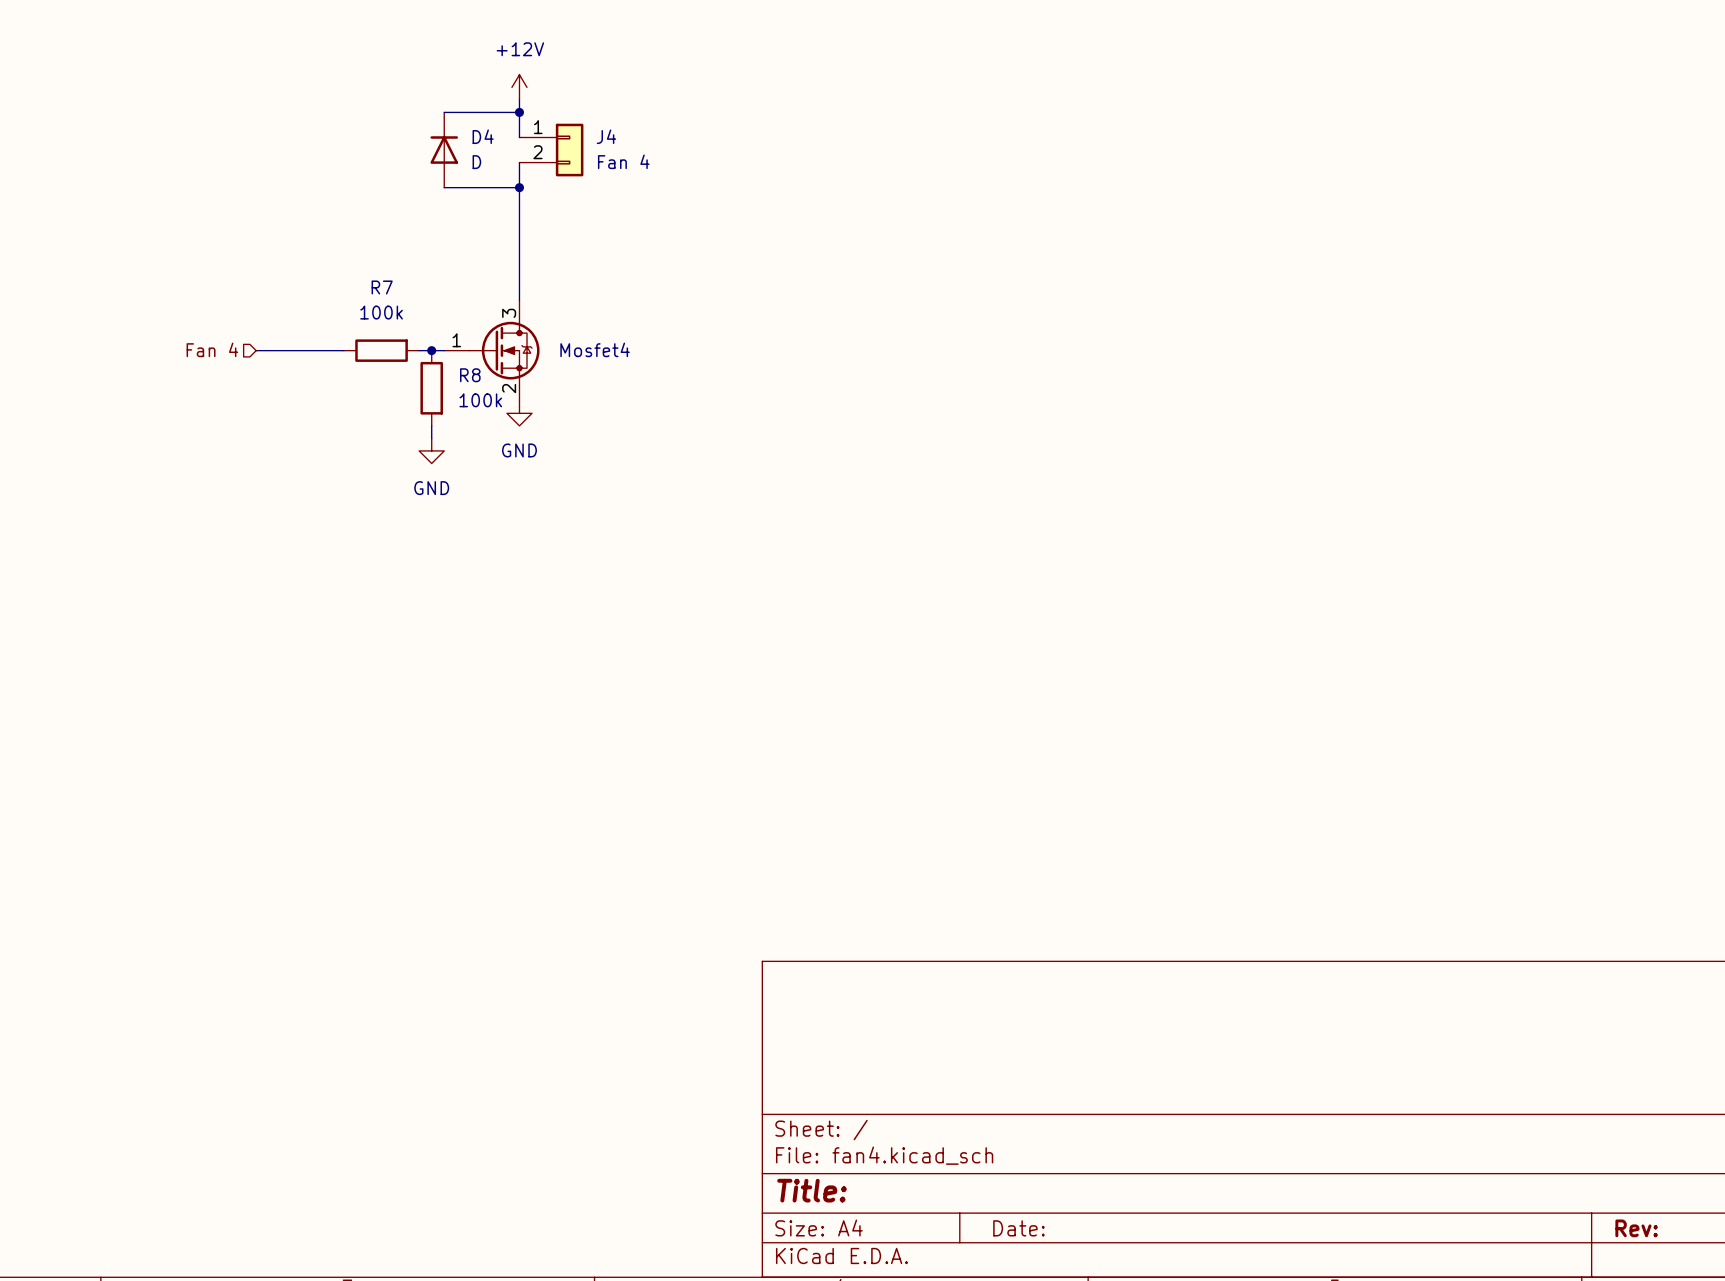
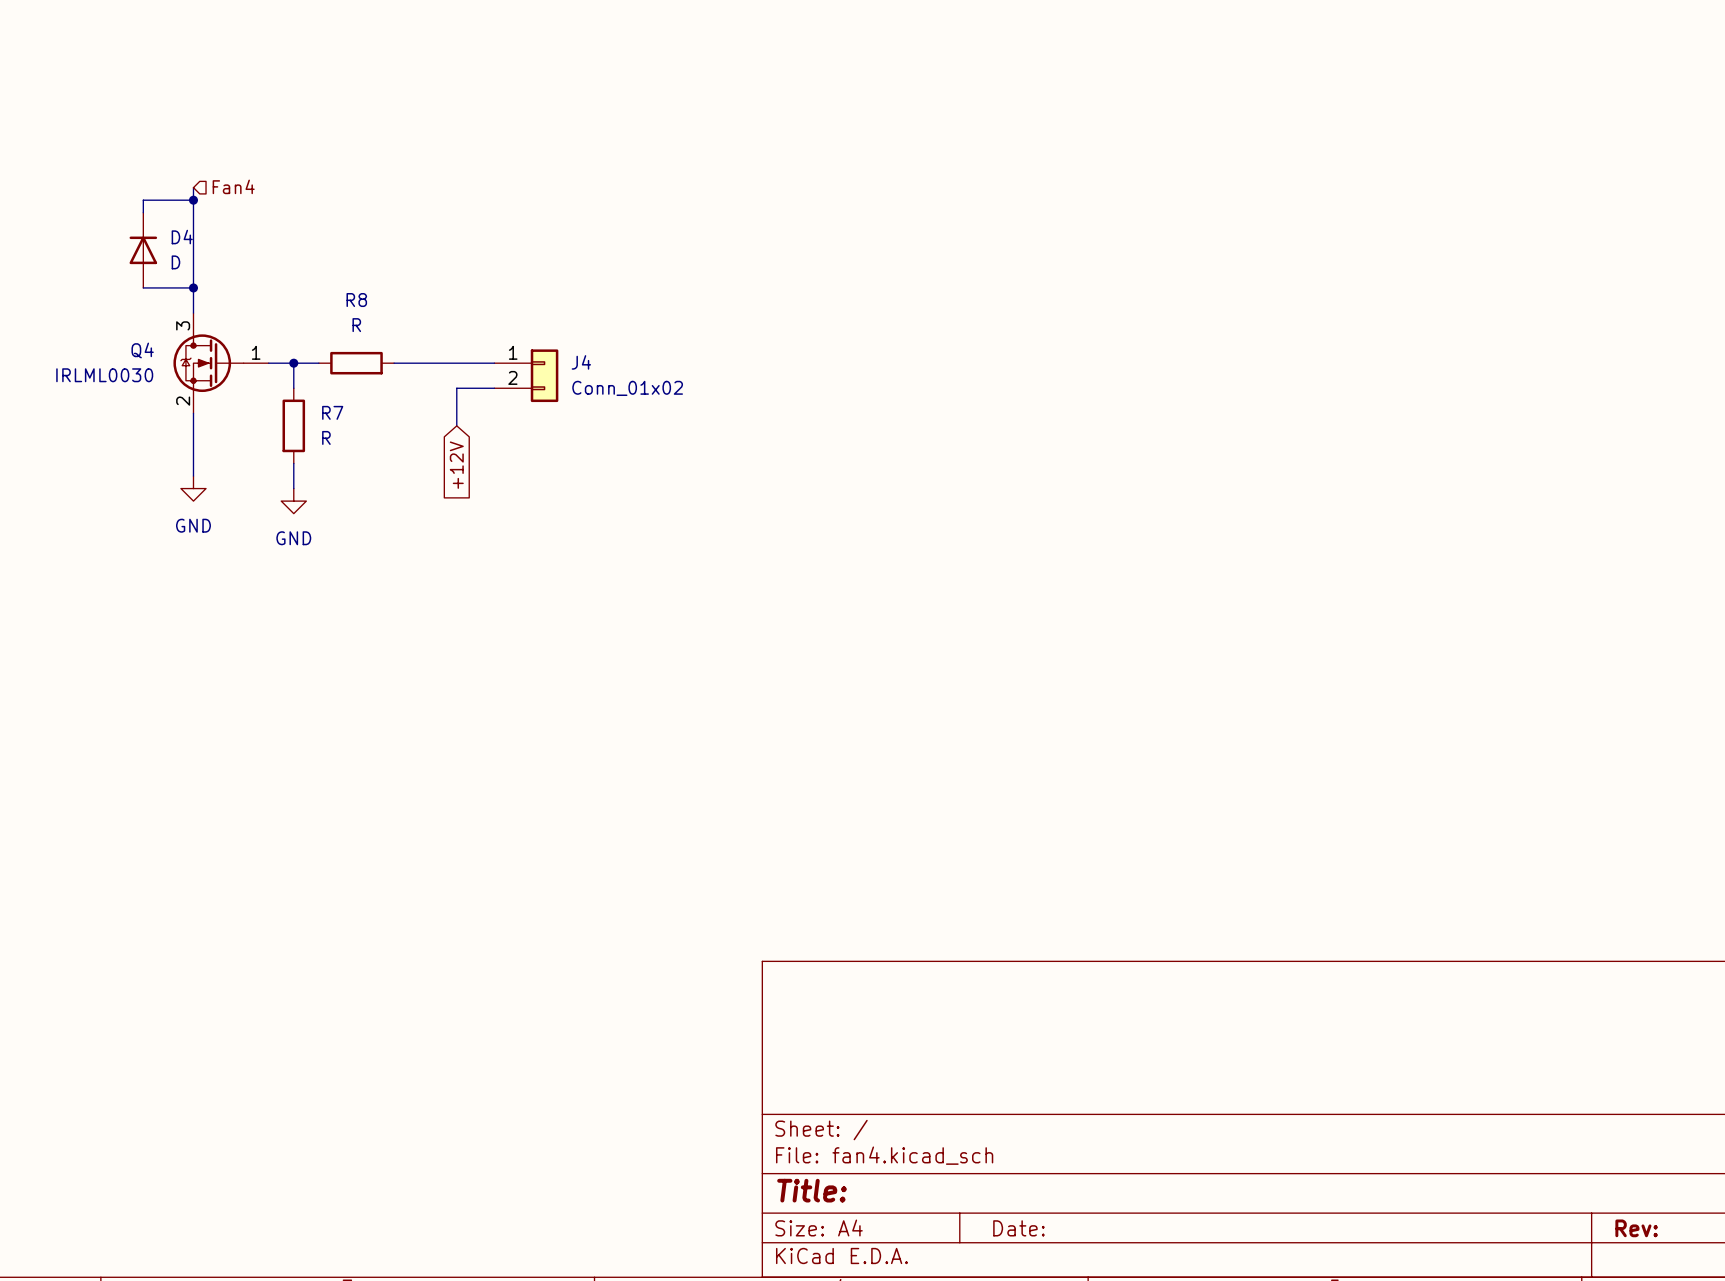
power symbol: +12V (519, 87) -> none
wire: (519, 99) (519, 137) -> none
wire: (444, 112) (519, 112) -> none
junction: (519, 112) -> none
D4 position: (444, 150) -> (143, 250)
J4 position: (551, 150) -> (526, 375)
J4 value: Fan 4 (623, 161) -> Conn_01x02 (627, 388)
wire: (519, 162) (519, 300) -> none
hierarchical label: none -> Fan4 (233, 186)
wire: none -> (193, 187) (193, 313)
wire: (444, 187) (519, 187) -> none
junction: (519, 187) -> none
wire: none -> (193, 200) (143, 200) (143, 212)
junction: none -> (193, 200)
wire: none -> (143, 287) (193, 287)
junction: none -> (193, 287)
R7 name position: R7 (382, 287) -> R7 (332, 412)
R7 value: 100k (381, 312) -> R (326, 437)
hierarchical label: Fan 4 (212, 349) -> none
wire: (256, 350) (343, 350) -> none
R7 rotation: 0° (381, 350) -> 90° clockwise (293, 425)
R7 position: (381, 350) -> (293, 425)
wire: (419, 350) (444, 350) -> none
junction: (431, 350) -> none
Mosfet4: (491, 350) -> none
Q4: none -> IRLML0030 (221, 363)
wire: none -> (268, 363) (318, 363)
wire: none -> (293, 363) (293, 388)
junction: none -> (293, 363)
wire: none -> (394, 363) (494, 363)
R8 name position: R8 (470, 375) -> R8 (356, 300)
R8 rotation: 0° (431, 388) -> 90° clockwise (356, 363)
R8 position: (431, 388) -> (356, 363)
wire: none -> (494, 388) (456, 388) (456, 425)
R8 value: 100k (480, 400) -> R (356, 325)
wire: none -> (193, 413) (193, 476)
power symbol: GND (519, 413) -> none
wire: (431, 425) (431, 438) -> none
power symbol: GND (431, 450) -> none
wire: none -> (293, 463) (293, 488)
global label: none -> +12V (456, 465)
power symbol: none -> GND (193, 488)
power symbol: none -> GND (293, 501)

